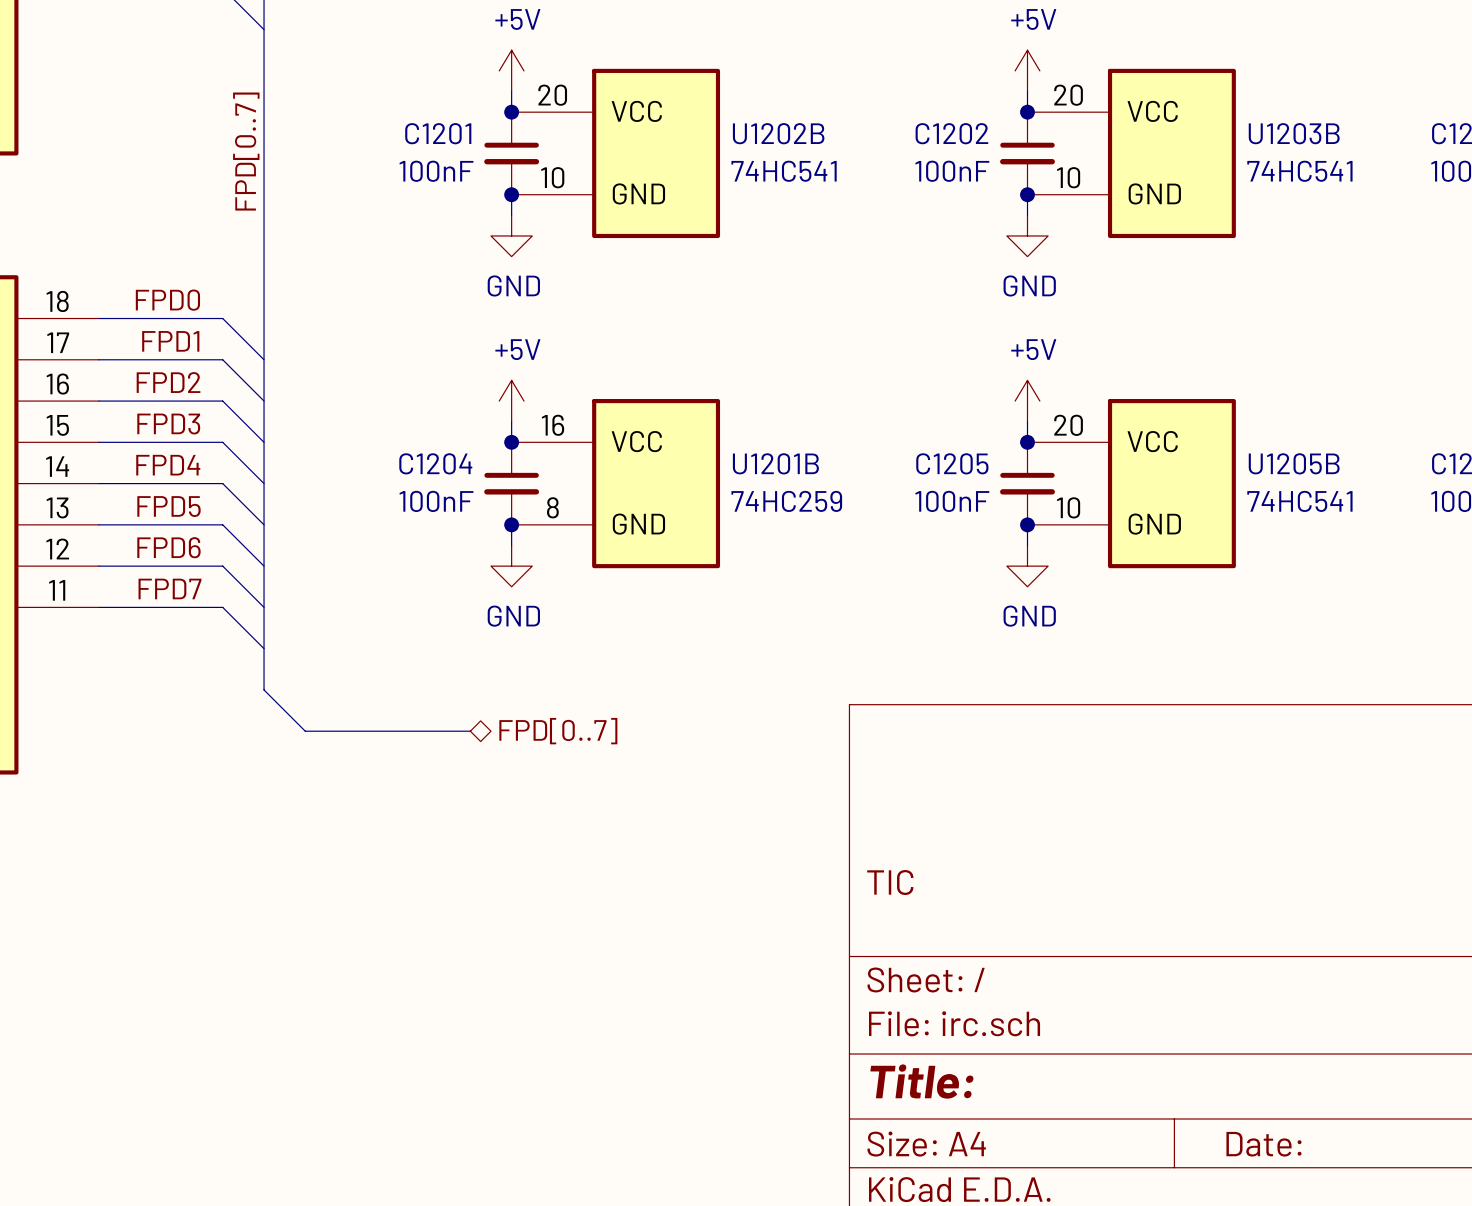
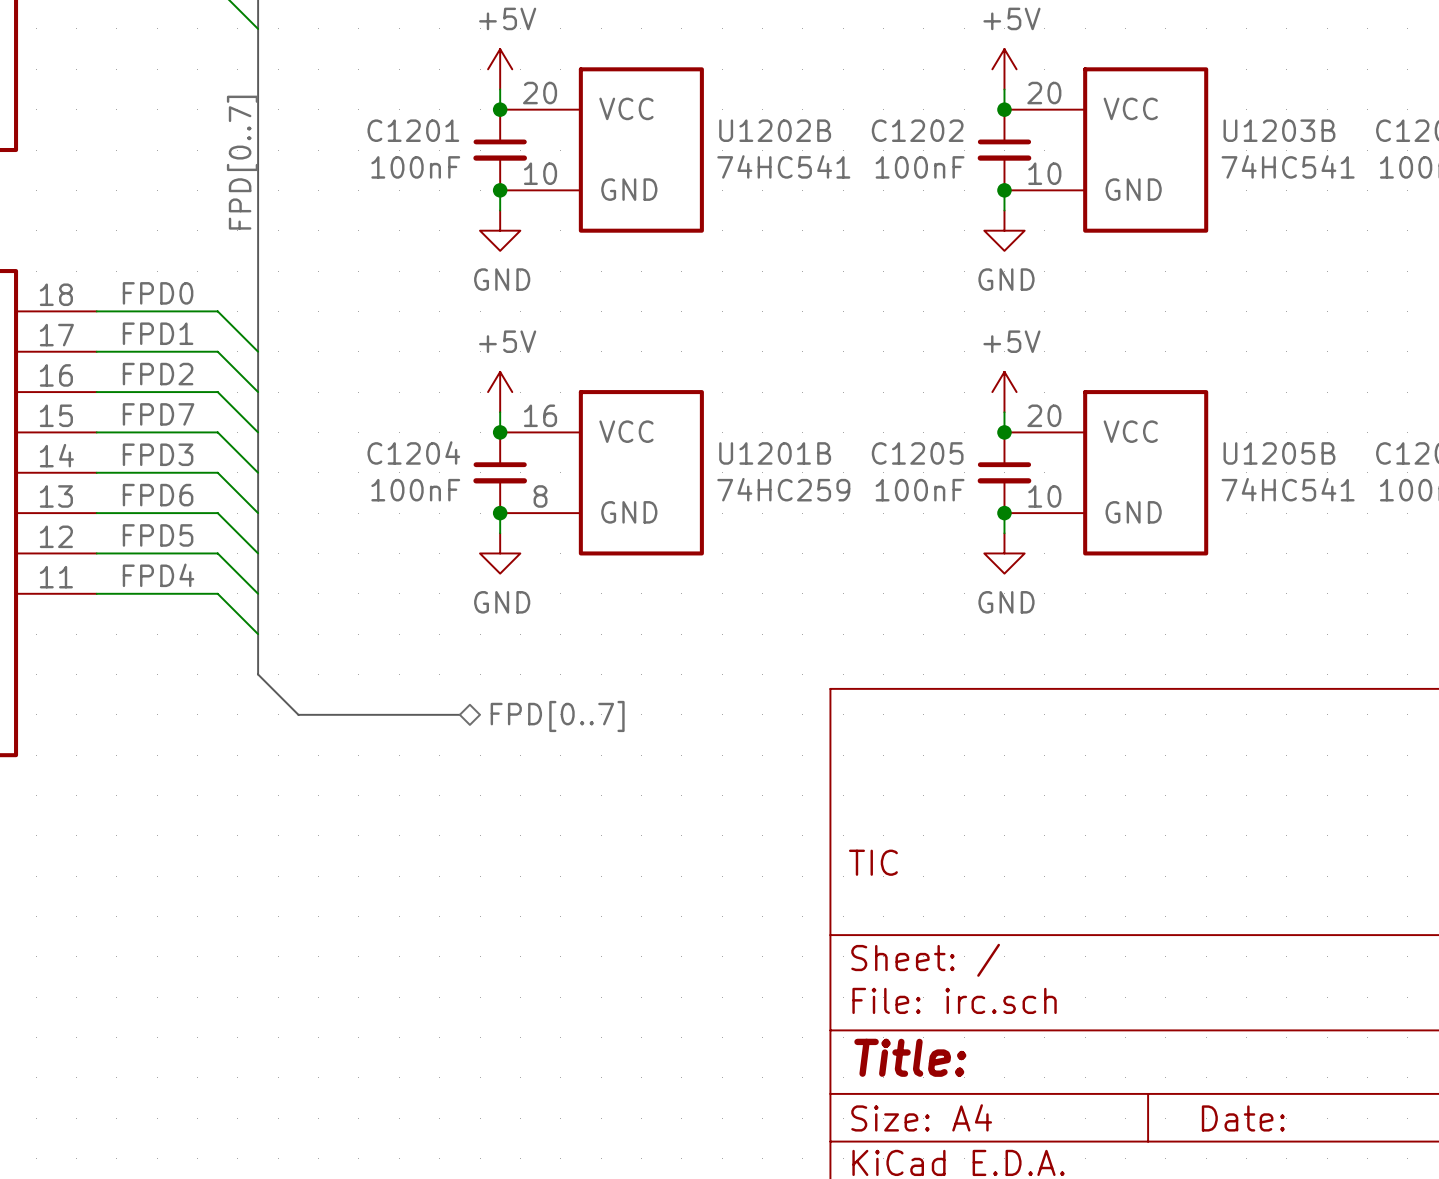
label: FPD3 (168, 424) -> FPD7 (158, 414)
label: FPD4 (168, 465) -> FPD3 (158, 454)
label: FPD5 (168, 506) -> FPD6 (158, 495)
label: FPD6 (168, 547) -> FPD5 (158, 535)
label: FPD7 (170, 588) -> FPD4 (158, 575)

